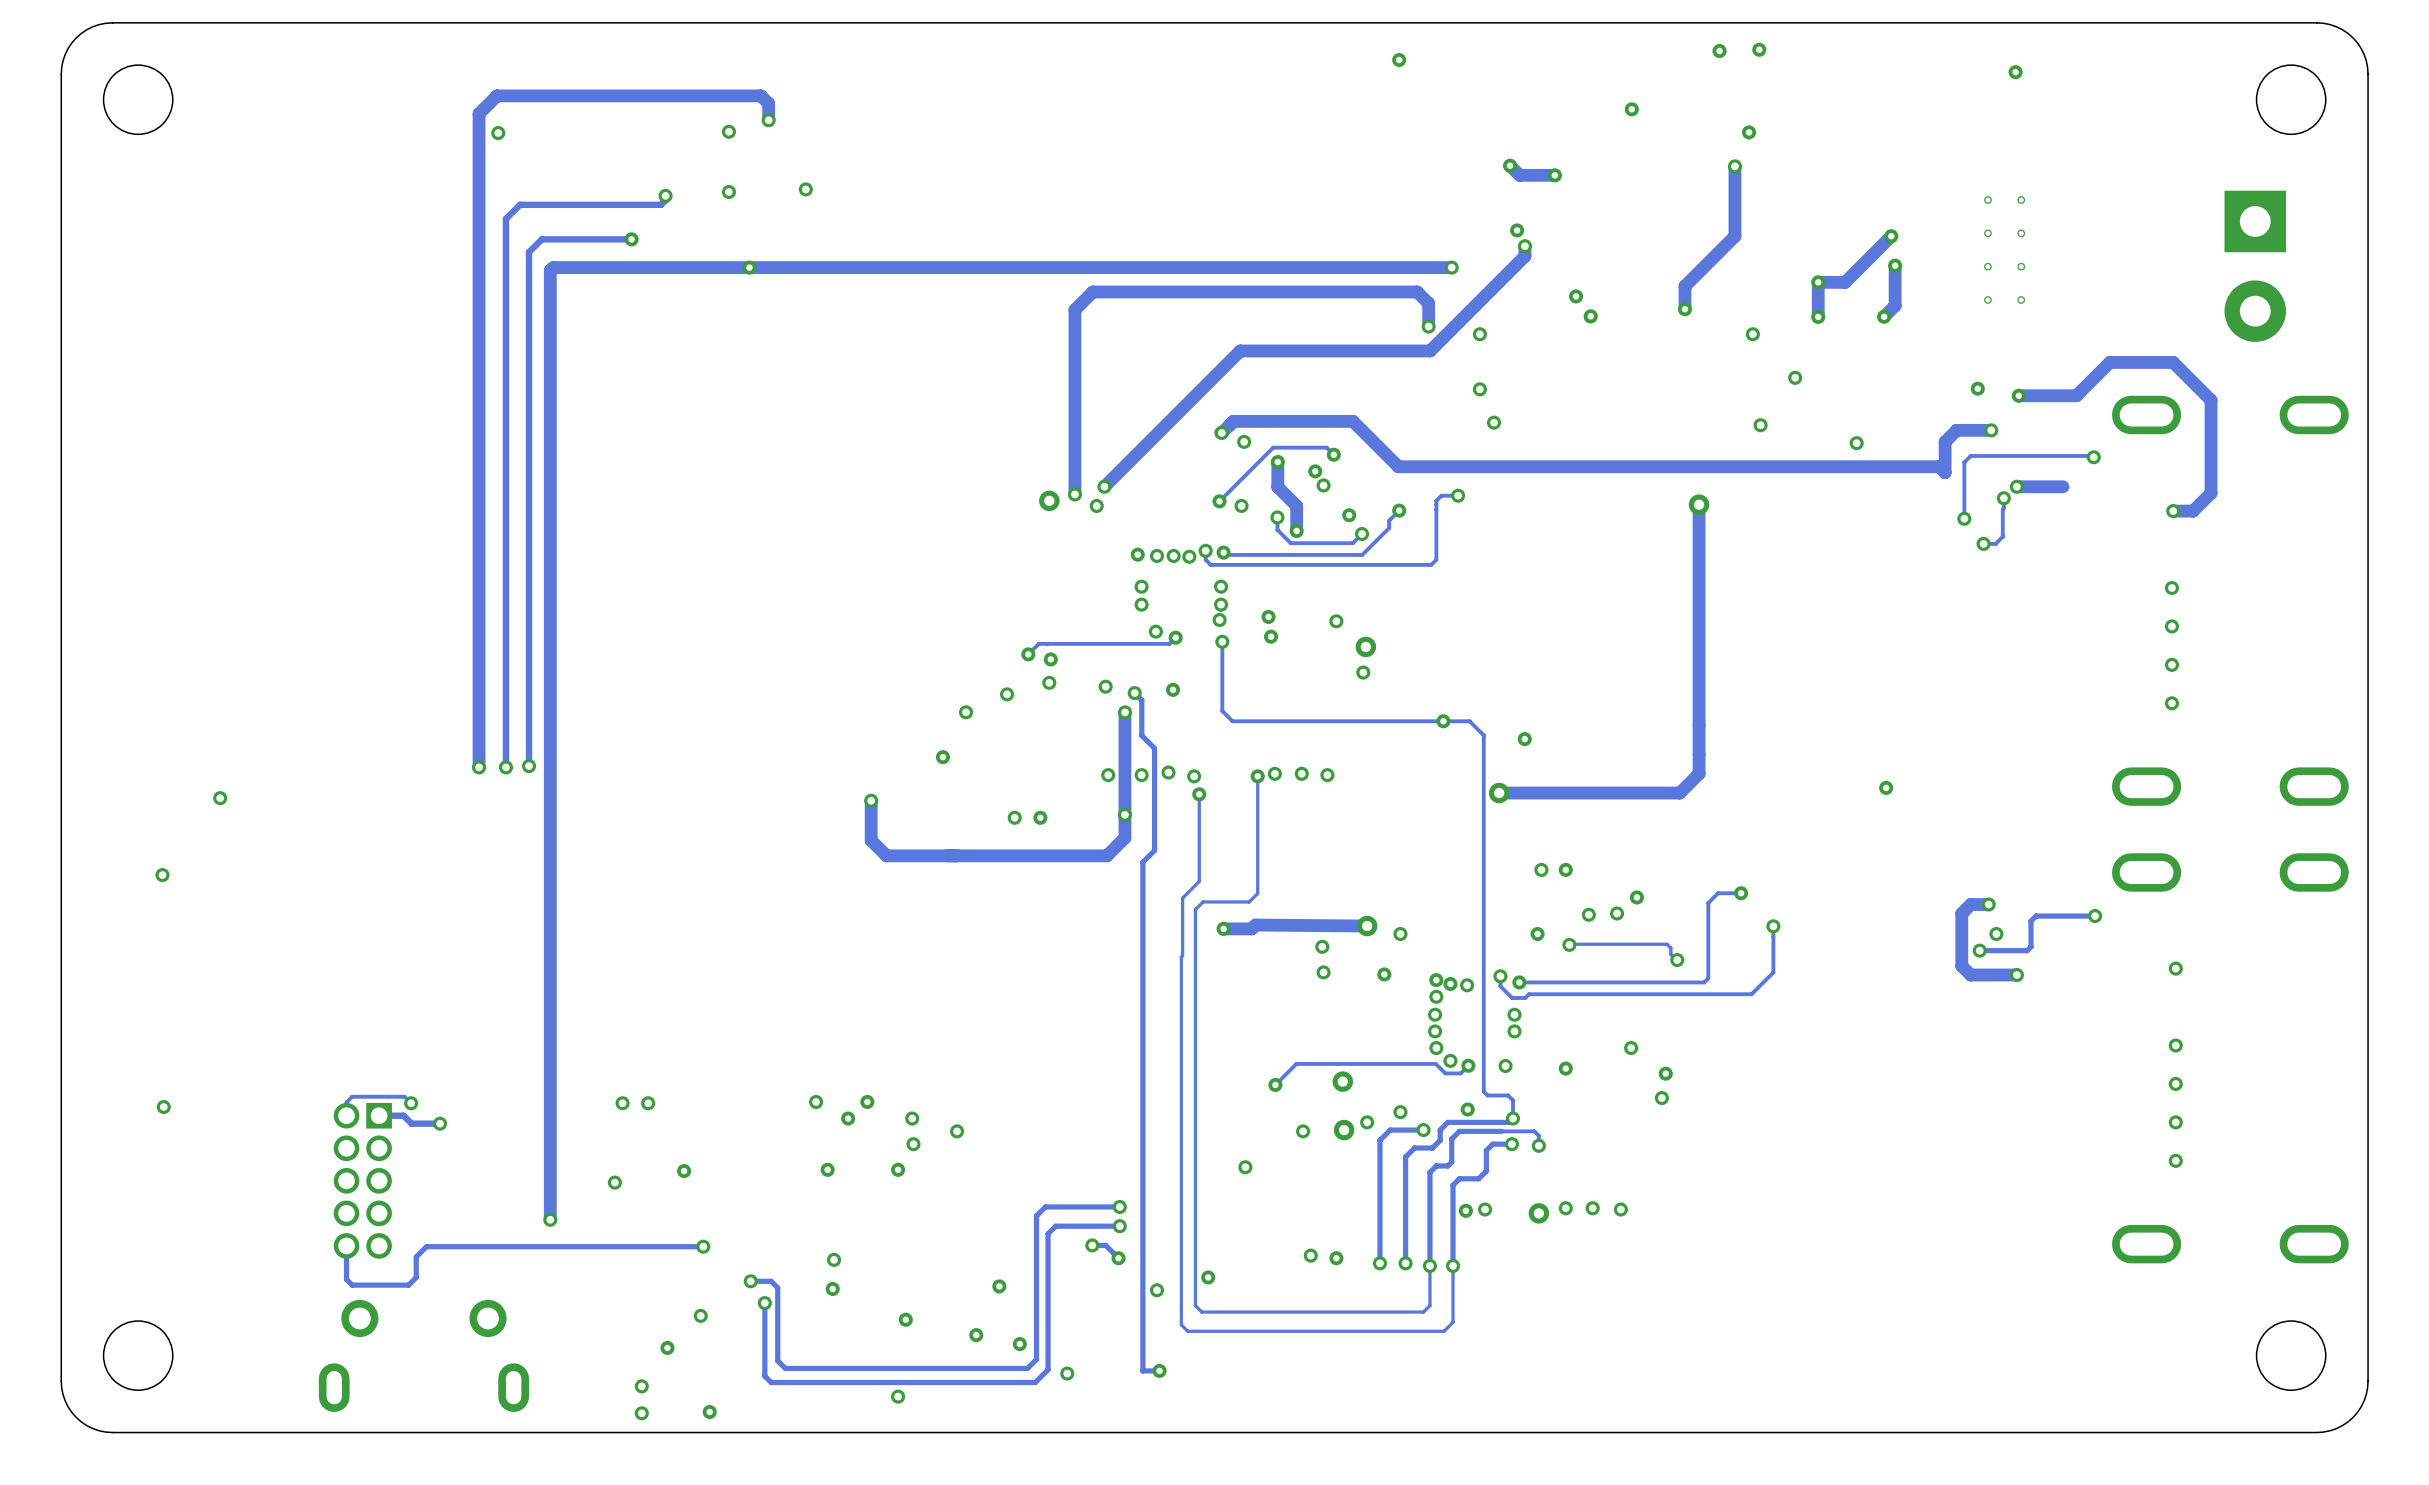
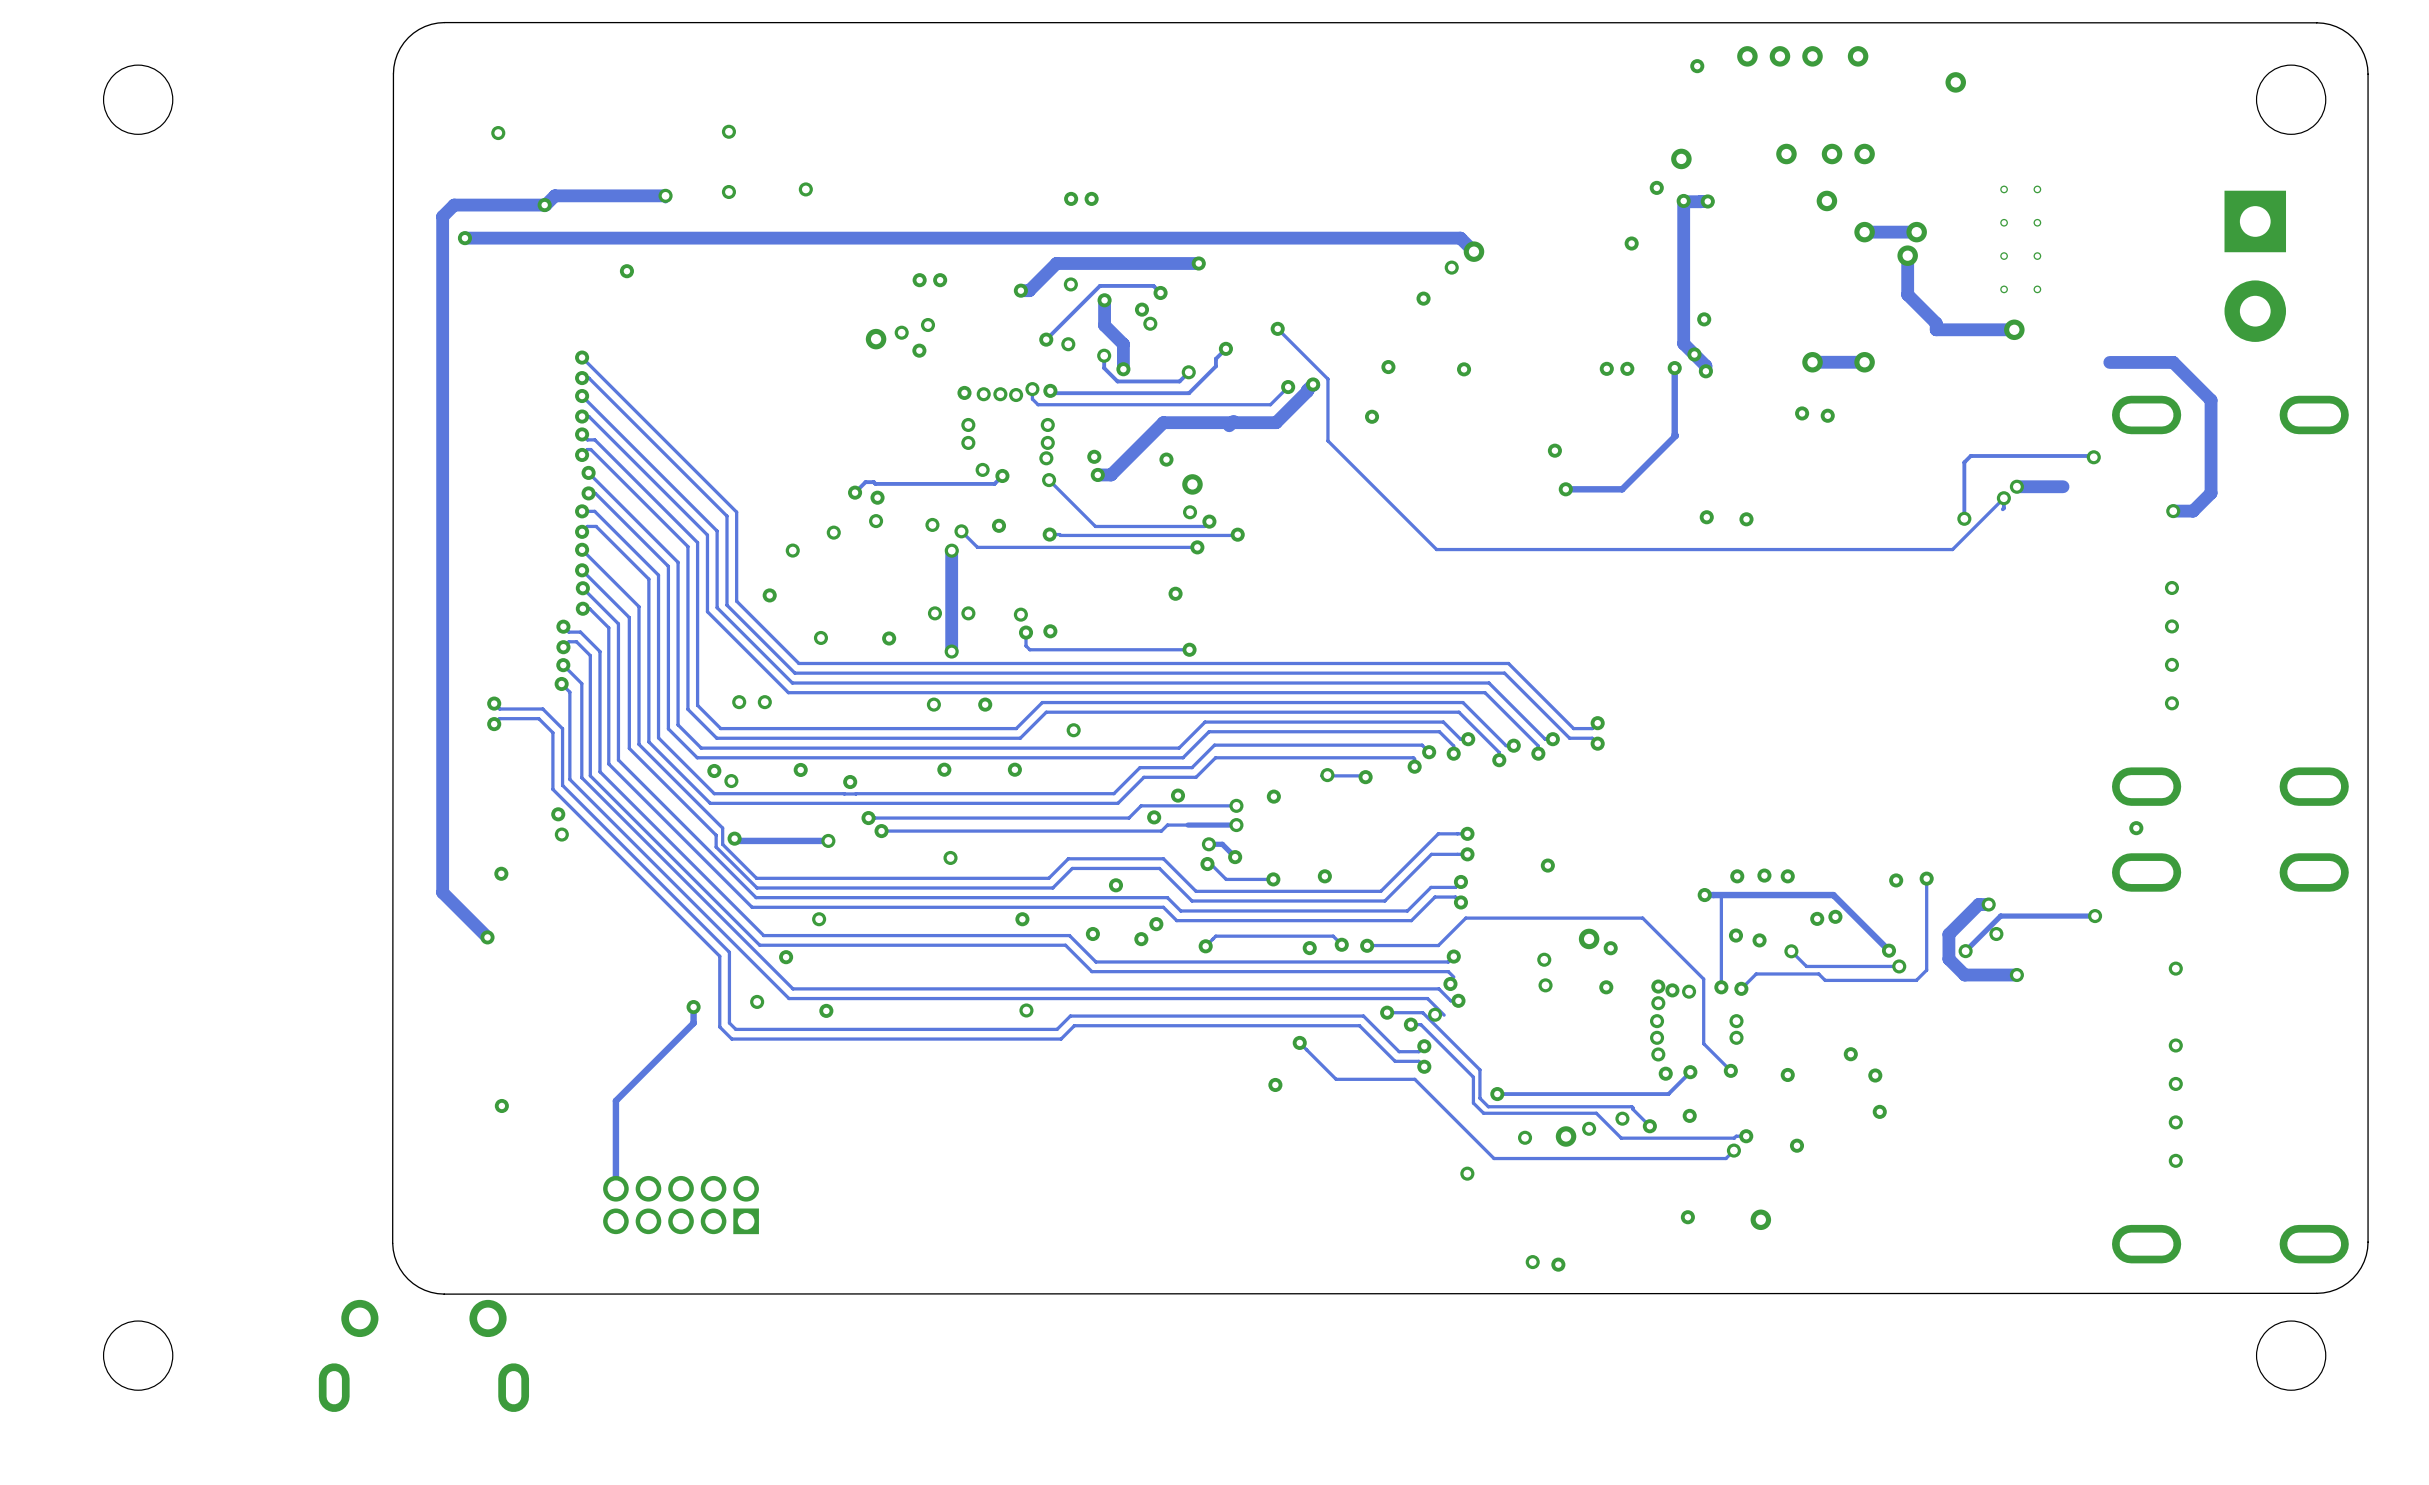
board edge: (2316, 22) (112, 22) (99, 24) (86, 29) (76, 37) (68, 48) (63, 60) (61, 74) (61, 1381) (65, 1400) (76, 1417) (92, 1428) (112, 1432) (2316, 1432) (2336, 1428) (2347, 1421) (2361, 1406) (2366, 1394) (2368, 1381) (2368, 1242) -> (2316, 22) (444, 22) (431, 24) (419, 29) (408, 37) (400, 48) (395, 60) (393, 73) (392, 1243) (396, 1262) (408, 1279) (424, 1290) (444, 1294) (2316, 1293) (2336, 1289) (2353, 1278) (2364, 1261) (2368, 1242)
via position: (1759, 49) -> (1747, 56)
via position: (1719, 51) -> (1697, 66)
via: none -> (1779, 56)
via: none -> (1812, 56)
via: none -> (1858, 56)
via: (1399, 60) -> none
via: (2015, 72) -> none
via: none -> (1955, 82)
via: (1631, 109) -> none
track: (768, 120) (768, 103) (760, 95) (496, 95) (479, 113) (479, 767) -> none
via: (768, 120) -> none
via: (1749, 132) -> none
via: none -> (1786, 154)
via: none -> (1832, 154)
via: none -> (1864, 154)
via: none -> (1681, 158)
track: (1510, 165) (1519, 175) (1554, 175) -> none
via: (1510, 165) -> none
track: (1734, 166) (1734, 236) (1684, 286) (1684, 309) -> none
via: (1734, 166) -> none
via: (1554, 175) -> none
via: none -> (1656, 187)
track: none -> (665, 195) (554, 195) (545, 205) (454, 205) (442, 216) (442, 892) (487, 937)
via: none -> (1071, 198)
via: none -> (1091, 198)
track: (665, 200) (661, 204) (520, 204) (505, 218) (505, 767) -> none
via: none -> (1683, 200)
via: none -> (1826, 200)
track: none -> (1700, 201) (1683, 200) (1683, 343) (1705, 365) (1705, 371)
via: none -> (1707, 201)
via: none -> (544, 205)
via: (1517, 230) -> none
via: none -> (1864, 232)
track: none -> (1916, 232) (1864, 232)
via: none -> (1916, 232)
track: (1891, 236) (1845, 282) (1818, 282) (1818, 316) -> none
via: (1891, 236) -> none
track: none -> (464, 238) (1460, 238) (1473, 251)
via: none -> (464, 238)
track: (631, 239) (541, 239) (529, 252) (529, 766) -> none
via position: (631, 239) -> (626, 271)
via: none -> (1631, 243)
track: (1524, 246) (1524, 256) (1430, 350) (1240, 350) (1104, 486) -> none
via: (1524, 246) -> none
part position: (2004, 250) -> (2020, 239)
via: none -> (1473, 251)
track: none -> (1907, 255) (1907, 294) (1936, 323) (1936, 329) (2014, 329)
track: none -> (1198, 263) (1056, 263) (1029, 290) (1020, 290)
via: none -> (1198, 263)
track: (1895, 265) (1895, 305) (1884, 316) -> none
via position: (1895, 265) -> (1907, 255)
via: (749, 267) -> none
track: (1451, 267) (553, 267) (550, 270) (550, 1219) -> none
via: none -> (919, 280)
via: none -> (940, 280)
via: (1818, 282) -> none
via: none -> (1070, 284)
via: none -> (1020, 290)
via: none -> (1160, 292)
via: (1576, 296) -> none
via: none -> (1423, 298)
via: none -> (1104, 300)
via: none -> (1141, 309)
via position: (1684, 309) -> (1704, 319)
via: (1590, 316) -> none
via: (1818, 316) -> none
via: (1884, 316) -> none
via: none -> (1150, 323)
via: none -> (928, 325)
track: (1428, 326) (1428, 303) (1417, 291) (1092, 291) (1074, 309) (1074, 494) -> none
via: (1428, 326) -> none
track: none -> (1277, 328) (1327, 379) (1327, 440) (1436, 549) (1952, 549) (2003, 498)
via: none -> (1277, 328)
via: none -> (2014, 329)
via: none -> (901, 332)
via: (1479, 334) -> none
via: (1752, 334) -> none
via: none -> (876, 339)
via: none -> (1046, 339)
via: none -> (1068, 344)
via: none -> (1225, 348)
via: none -> (919, 350)
via: none -> (1694, 354)
via: none -> (1104, 355)
track: none -> (582, 357) (736, 512) (736, 601) (798, 663) (1508, 663) (1573, 728) (1592, 728) (1597, 723)
via: none -> (582, 357)
via: none -> (1812, 362)
track: none -> (1864, 362) (1812, 362)
via: none -> (1864, 362)
track: (2109, 362) (2076, 395) (2018, 395) -> none
via: none -> (1388, 367)
via: none -> (1606, 368)
via: none -> (1627, 368)
track: none -> (1674, 368) (1675, 435) (1622, 489) (1565, 489)
via: none -> (1674, 368)
via: none -> (1123, 369)
via: none -> (1464, 369)
via: none -> (1705, 371)
via: none -> (1188, 372)
via: (1795, 377) -> none
track: none -> (582, 378) (588, 378) (726, 516) (726, 605) (794, 673) (1504, 673) (1569, 738) (1592, 738) (1597, 743)
via: none -> (582, 378)
track: none -> (1313, 384) (1276, 422) (1163, 422) (1111, 474) (1097, 474)
via: none -> (1313, 384)
track: none -> (1288, 387) (1270, 404) (1038, 404) (1032, 399) (1032, 389)
via: none -> (1288, 387)
via: (1977, 388) -> none
via: none -> (1032, 389)
via: (1479, 389) -> none
via: none -> (1050, 390)
via: none -> (964, 392)
via: none -> (983, 394)
via: none -> (1000, 394)
via: none -> (1016, 395)
via: (2018, 395) -> none
track: none -> (582, 396) (717, 531) (717, 607) (792, 683) (1489, 683) (1545, 739) (1552, 739)
via: none -> (582, 396)
via: none -> (1802, 413)
via: none -> (1827, 415)
track: none -> (582, 416) (588, 416) (707, 535) (707, 611) (788, 692) (1485, 692) (1538, 746) (1538, 753)
via: none -> (582, 416)
via: none -> (1372, 416)
via: (1494, 422) -> none
via: none -> (968, 424)
via: none -> (1047, 424)
via: (1760, 425) -> none
track: (1991, 430) (1956, 430) (1945, 441) (1945, 472) (1939, 466) (1398, 466) (1353, 421) (1233, 421) (1220, 432) -> none
via: (1991, 430) -> none
via: (1221, 432) -> none
track: none -> (582, 434) (587, 439) (594, 439) (697, 542) (697, 705) (720, 728) (1016, 728) (1042, 702) (1462, 702) (1506, 745) (1513, 745)
via: none -> (582, 434)
via: (1244, 441) -> none
via: none -> (968, 442)
via: none -> (1047, 442)
via: (1856, 443) -> none
via: none -> (1554, 450)
track: none -> (582, 454) (587, 449) (590, 449) (687, 546) (687, 709) (716, 738) (1020, 738) (1046, 712) (1458, 712) (1499, 752) (1499, 760)
via: none -> (582, 454)
track: (1333, 454) (1326, 447) (1273, 447) (1219, 501) -> (1160, 292) (1153, 285) (1099, 285) (1046, 339)
via: (1333, 454) -> none
via: none -> (1094, 456)
via: none -> (1046, 458)
via: none -> (1166, 459)
track: (1277, 462) (1277, 487) (1296, 505) (1296, 530) -> (1104, 300) (1104, 325) (1123, 344) (1123, 369)
via: (1277, 462) -> none
via: none -> (982, 469)
via: (1315, 471) -> none
track: none -> (588, 472) (678, 562) (678, 724) (701, 748) (1179, 748) (1205, 722) (1443, 722) (1460, 739) (1468, 739)
via: none -> (588, 472)
track: none -> (1002, 475) (994, 483) (875, 483) (865, 482) (855, 492)
via: none -> (1002, 475)
track: none -> (1049, 480) (1095, 526) (1204, 526) (1209, 521)
via: none -> (1049, 480)
via: none -> (1192, 484)
via: (1323, 485) -> none
via position: (1104, 486) -> (1097, 474)
via: none -> (1565, 489)
via: none -> (855, 492)
track: none -> (588, 493) (595, 493) (668, 566) (668, 728) (697, 757) (1183, 757) (1209, 731) (1439, 731) (1453, 746) (1453, 753)
via: none -> (588, 493)
via: (1074, 494) -> none
track: (1458, 495) (1441, 495) (1436, 500) (1436, 559) (1431, 564) (1210, 564) (1205, 559) (1205, 550) -> none
via: (1458, 495) -> none
via: none -> (877, 497)
via: (1049, 500) -> none
via: (1219, 501) -> none
track: (1699, 504) (1699, 773) (1679, 793) (1499, 793) -> none
via position: (1699, 504) -> (1706, 517)
via: (1096, 505) -> none
via: (1241, 505) -> none
track: (2002, 509) (2002, 536) (1995, 543) (1983, 543) -> none
track: (1399, 510) (1389, 520) (1389, 528) (1362, 554) (1225, 554) (1223, 552) -> (1225, 348) (1215, 358) (1215, 366) (1189, 393) (1052, 393) (1050, 390)
via: (1399, 510) -> none
track: none -> (582, 511) (594, 511) (658, 575) (658, 737) (714, 793) (844, 793)
via: none -> (582, 511)
via: none -> (1190, 512)
via: (1349, 515) -> none
track: (1277, 517) (1277, 529) (1290, 543) (1352, 543) (1362, 534) -> (1104, 355) (1104, 368) (1117, 381) (1179, 381) (1188, 372)
via: (1277, 517) -> none
via: none -> (1746, 519)
via: none -> (876, 521)
via: none -> (1209, 521)
via: none -> (932, 524)
via: none -> (998, 525)
via: (1296, 530) -> none
track: none -> (582, 531) (587, 526) (596, 526) (648, 579) (648, 741) (710, 803) (1117, 803) (1143, 777) (1196, 777) (1215, 757) (1413, 757) (1414, 766)
via: none -> (582, 531)
track: none -> (961, 531) (977, 547) (1197, 547)
via: none -> (961, 531)
via: none -> (833, 532)
via: none -> (1049, 534)
track: none -> (1237, 534) (1049, 534)
via: none -> (1237, 534)
via: (1362, 534) -> none
via: (1983, 543) -> none
via: none -> (1197, 547)
track: none -> (582, 549) (639, 606) (639, 744) (722, 828) (722, 844) (756, 878) (1048, 878) (1068, 858) (1163, 858) (1196, 891) (1380, 891) (1438, 833) (1467, 833)
via: none -> (582, 549)
via: none -> (792, 550)
track: none -> (951, 550) (951, 651)
via: none -> (951, 550)
via: (1205, 550) -> none
via: (1223, 552) -> none
via: (1137, 554) -> none
via: (1156, 555) -> none
via: (1173, 555) -> none
via: (1189, 556) -> none
track: none -> (582, 570) (629, 617) (629, 748) (716, 835) (716, 847) (757, 887) (1052, 887) (1072, 868) (1159, 868) (1192, 901) (1384, 901) (1431, 854) (1467, 854)
via: none -> (582, 570)
via: (1141, 586) -> none
via: (1221, 586) -> none
track: none -> (582, 588) (618, 623) (618, 760) (756, 897) (1167, 897) (1180, 910) (1407, 910) (1431, 887) (1455, 887) (1460, 881)
via: none -> (582, 588)
via: none -> (1175, 593)
via: none -> (769, 595)
via: (1141, 604) -> none
via: (1221, 604) -> none
track: none -> (582, 608) (589, 608) (608, 627) (608, 764) (752, 907) (1163, 907) (1176, 920) (1411, 920) (1435, 897) (1455, 897) (1460, 902)
via: none -> (582, 608)
via: none -> (934, 613)
via: none -> (968, 613)
via: none -> (1020, 614)
via: (1268, 616) -> none
via: (1219, 620) -> none
via: (1336, 621) -> none
track: none -> (563, 626) (568, 632) (580, 632) (599, 651) (599, 771) (763, 935) (1069, 935) (1095, 961) (1448, 961) (1453, 956)
via: none -> (563, 626)
via: none -> (1050, 631)
via: (1155, 631) -> none
track: none -> (1026, 632) (1026, 645) (1029, 649) (1189, 649)
via: none -> (1026, 632)
via: (1271, 636) -> none
via: none -> (820, 637)
track: (1175, 637) (1169, 643) (1038, 643) (1028, 654) -> none
via position: (1175, 637) -> (1189, 649)
via: none -> (889, 638)
track: (1222, 641) (1222, 711) (1232, 721) (1469, 721) (1483, 735) (1483, 1091) (1487, 1095) (1508, 1095) (1513, 1100) (1513, 1118) (1509, 1122) (1447, 1122) (1440, 1130) (1440, 1140) (1432, 1148) (1414, 1148) (1405, 1156) (1405, 1263) -> none
via: (1222, 641) -> none
via: (1365, 646) -> none
track: none -> (563, 647) (568, 641) (576, 641) (590, 655) (590, 775) (759, 945) (1065, 945) (1091, 971) (1448, 971) (1453, 977)
via: none -> (563, 647)
via: none -> (951, 651)
via: (1028, 654) -> none
via: (1050, 659) -> none
track: none -> (563, 665) (581, 683) (581, 777) (792, 988) (1438, 988) (1450, 1000) (1458, 1000)
via: none -> (563, 665)
via: (1363, 672) -> none
via: (1049, 682) -> none
track: none -> (561, 683) (569, 692) (569, 779) (788, 998) (1427, 998) (1444, 1015)
via: none -> (561, 683)
via: (1105, 686) -> none
via: (1173, 689) -> none
track: (1134, 693) (1141, 700) (1141, 735) (1154, 748) (1154, 850) (1142, 862) (1142, 1370) -> none
via: (1134, 693) -> none
via: (1007, 694) -> none
via: none -> (739, 702)
via: none -> (764, 702)
track: none -> (494, 703) (499, 709) (542, 709) (562, 728) (562, 785) (729, 952) (729, 1022) (735, 1029) (1057, 1029) (1070, 1016) (1363, 1016) (1399, 1051) (1418, 1051) (1424, 1046)
via: none -> (494, 703)
via: none -> (933, 704)
via: none -> (985, 704)
via: (966, 712) -> none
track: (1124, 712) (1124, 837) (1107, 855) (886, 855) (871, 840) (871, 800) -> none
via: (1125, 712) -> none
via: (1443, 721) -> none
via: none -> (1597, 723)
track: none -> (494, 724) (499, 718) (538, 718) (552, 732) (552, 789) (719, 956) (719, 1026) (731, 1039) (1061, 1039) (1074, 1025) (1359, 1025) (1395, 1061) (1418, 1061) (1424, 1066)
via: none -> (494, 724)
via: none -> (1073, 730)
via: none -> (1468, 739)
via position: (1524, 739) -> (1513, 745)
via: none -> (1552, 739)
via: none -> (1597, 743)
track: none -> (1429, 752) (1422, 745) (1214, 745) (1192, 767) (1139, 767) (1113, 793) (856, 793)
via: none -> (1429, 752)
via: none -> (1453, 753)
via: none -> (1538, 753)
via position: (942, 757) -> (944, 769)
via: none -> (1499, 760)
via: (529, 766) -> none
via: none -> (1414, 766)
via: (479, 767) -> none
via: (505, 767) -> none
via: none -> (800, 769)
via: none -> (1014, 769)
via: none -> (714, 770)
via: (1168, 772) -> none
via: (1274, 773) -> none
via: (1301, 773) -> none
via: (1108, 775) -> none
via: (1141, 775) -> none
track: none -> (1321, 775) (1365, 777)
via: (1194, 776) -> none
track: (1257, 776) (1257, 893) (1249, 901) (1203, 901) (1195, 909) (1195, 1305) (1201, 1312) (1423, 1312) (1429, 1305) (1429, 1172) (1436, 1165) (1447, 1165) (1451, 1162) (1451, 1139) (1459, 1131) (1534, 1131) (1538, 1135) (1538, 1145) -> none
via position: (1257, 776) -> (1273, 796)
via: none -> (1365, 777)
via: none -> (731, 781)
via: none -> (850, 782)
via: (1886, 787) -> none
track: none -> (855, 793) (844, 793)
via: (1499, 793) -> none
track: (1199, 794) (1199, 881) (1182, 898) (1181, 1324) (1187, 1331) (1444, 1331) (1453, 1322) (1453, 1185) (1459, 1178) (1478, 1178) (1486, 1171) (1486, 1150) (1492, 1144) (1511, 1144) -> none
via position: (1199, 794) -> (1178, 795)
via: (220, 798) -> none
via: (871, 800) -> none
track: none -> (1236, 805) (1141, 805) (1128, 818) (868, 818)
via: none -> (1236, 805)
via: none -> (558, 814)
via: (1124, 814) -> none
via: (1014, 817) -> none
via: (1040, 817) -> none
via: none -> (1154, 817)
via: none -> (868, 818)
track: none -> (1236, 825) (1167, 825) (1161, 831) (881, 831)
via: none -> (1236, 825)
via: none -> (2136, 828)
via: none -> (881, 831)
via: none -> (1467, 833)
via: none -> (561, 834)
track: none -> (734, 838) (736, 840) (828, 840)
via: none -> (734, 838)
via: none -> (828, 840)
via: none -> (1208, 844)
via: none -> (1467, 854)
via: none -> (950, 857)
via: none -> (1235, 857)
track: none -> (1207, 864) (1210, 864) (1226, 879) (1273, 879)
via: none -> (1207, 864)
via: (1541, 869) -> none
via position: (1565, 869) -> (1547, 865)
via: none -> (501, 873)
via: (162, 875) -> none
via: none -> (1764, 875)
via: none -> (1324, 876)
via: none -> (1737, 876)
via: none -> (1787, 876)
track: none -> (1926, 878) (1926, 970) (1916, 980) (1825, 980) (1818, 973) (1756, 973) (1741, 988)
via: none -> (1926, 878)
via: none -> (1273, 879)
via: none -> (1896, 880)
via: none -> (1460, 881)
via: none -> (1115, 885)
track: (1741, 893) (1718, 893) (1708, 902) (1708, 978) (1704, 982) (1519, 982) -> none
via: (1741, 893) -> none
track: none -> (1704, 895) (1833, 895) (1888, 950)
via: none -> (1704, 895)
track: none -> (1713, 895) (1721, 896) (1721, 987)
via: (1636, 897) -> none
via: none -> (1460, 902)
track: (1978, 904) (1970, 904) (1961, 913) (1961, 966) (1970, 975) -> (1978, 904) (1948, 934) (1948, 959) (1964, 975) (1970, 975)
via: (1617, 913) -> none
via: (1588, 914) -> none
via: none -> (1835, 916)
track: (2036, 916) (2030, 921) (2030, 946) (2027, 950) (1979, 950) -> (2036, 916) (2000, 916) (1965, 951)
via: none -> (1817, 918)
via: none -> (819, 919)
via: none -> (1022, 919)
via: none -> (1156, 924)
track: (1367, 926) (1255, 925) (1251, 928) (1223, 928) -> none
via: (1367, 926) -> none
track: (1773, 926) (1773, 972) (1751, 994) (1529, 994) (1525, 998) (1512, 998) (1500, 986) (1500, 976) -> none
via position: (1773, 926) -> (1791, 951)
via position: (1223, 928) -> (1205, 946)
via: none -> (1092, 934)
via: (1400, 934) -> none
via: (1537, 934) -> none
via: none -> (1735, 935)
via: none -> (487, 937)
via: none -> (1589, 938)
via: none -> (1141, 939)
via: none -> (1759, 940)
track: none -> (1341, 944) (1333, 936) (1215, 936) (1205, 946)
via: none -> (1341, 944)
track: (1569, 944) (1667, 944) (1670, 948) (1670, 954) (1677, 960) -> none
via: (1569, 944) -> none
track: none -> (1367, 945) (1438, 945) (1465, 918) (1642, 918) (1703, 979) (1703, 1043) (1730, 1070)
via: none -> (1367, 945)
via position: (1322, 946) -> (1309, 948)
via: none -> (1610, 948)
via: none -> (1888, 950)
via position: (1979, 950) -> (1965, 951)
track: none -> (1791, 951) (1806, 966) (1899, 966)
via: none -> (1453, 956)
via: none -> (786, 957)
via: none -> (1544, 959)
via: (1677, 960) -> none
via: none -> (1899, 966)
via: (1323, 972) -> none
via: (1384, 974) -> none
via: (1500, 976) -> none
via: (1436, 980) -> none
via: (1519, 982) -> none
via: (1467, 985) -> none
via: none -> (1545, 985)
via: none -> (1658, 986)
via: none -> (1606, 987)
via: none -> (1721, 987)
via: none -> (1741, 988)
via: none -> (1672, 990)
via: none -> (1689, 991)
via: (1436, 996) -> none
via: none -> (1458, 1000)
via: none -> (757, 1001)
via: none -> (1658, 1003)
track: none -> (693, 1007) (693, 1023) (615, 1100) (615, 1188)
via: none -> (693, 1007)
via: none -> (826, 1010)
via: none -> (1026, 1010)
track: none -> (1387, 1012) (1422, 1012) (1479, 1069) (1479, 1098) (1488, 1106) (1631, 1106) (1649, 1126)
via: none -> (1387, 1012)
via: (1514, 1014) -> none
via: none -> (1657, 1021)
via: none -> (1736, 1021)
track: none -> (1410, 1024) (1420, 1024) (1473, 1077) (1473, 1103) (1483, 1113) (1596, 1113) (1621, 1138) (1734, 1138) (1736, 1136) (1746, 1136)
via: none -> (1410, 1024)
via: (1435, 1031) -> none
via: (1514, 1031) -> none
via: none -> (1657, 1037)
via: none -> (1736, 1037)
track: none -> (1299, 1042) (1336, 1079) (1414, 1079) (1494, 1158) (1725, 1158) (1733, 1150)
via: none -> (1299, 1042)
via position: (1436, 1048) -> (1424, 1046)
via: (1631, 1048) -> none
via: none -> (1658, 1054)
via: none -> (1850, 1054)
via: (1450, 1060) -> none
track: (1468, 1065) (1460, 1073) (1445, 1073) (1435, 1063) (1296, 1063) (1275, 1084) -> none
via: (1468, 1065) -> none
via: none -> (1424, 1066)
via: (1505, 1066) -> none
via: (1565, 1068) -> none
via: none -> (1730, 1070)
track: none -> (1690, 1072) (1668, 1094) (1497, 1094)
via: none -> (1690, 1072)
via: none -> (1787, 1074)
via: none -> (1875, 1075)
via: (1342, 1081) -> none
via: none -> (1497, 1094)
via: (1661, 1098) -> none
via: (816, 1101) -> none
via: (867, 1101) -> none
track: (411, 1103) (404, 1096) (352, 1096) (346, 1102) (346, 1115) -> none
via: (411, 1103) -> none
via: (622, 1103) -> none
via: (648, 1103) -> none
via: none -> (501, 1105)
via: (163, 1107) -> none
via: (1467, 1109) -> none
via: none -> (1879, 1111)
via: (1400, 1112) -> none
track: (379, 1115) (403, 1115) (411, 1123) (440, 1123) -> none
via: none -> (1689, 1115)
via: (848, 1118) -> none
via: (912, 1118) -> none
via: (1513, 1118) -> none
via: none -> (1622, 1118)
via: (1367, 1122) -> none
via: (440, 1123) -> none
via: none -> (1649, 1126)
via: none -> (1589, 1128)
via: (1344, 1130) -> none
track: (1423, 1130) (1390, 1130) (1379, 1140) (1379, 1263) -> none
via: (1423, 1130) -> none
via: (957, 1131) -> none
via: (1303, 1131) -> none
via: none -> (1746, 1136)
via: none -> (1525, 1137)
via: (913, 1144) -> none
via: (1511, 1144) -> none
via: (1538, 1145) -> none
via: none -> (1796, 1145)
via: none -> (1733, 1150)
via: (1245, 1167) -> none
via: (827, 1169) -> none
via: (898, 1169) -> none
via: (684, 1171) -> none
via: none -> (1467, 1173)
part rotation: 0° (362, 1180) -> 90° clockwise (681, 1205)
part position: (362, 1180) -> (681, 1205)
via: (614, 1182) -> none
track: (1119, 1206) (1045, 1206) (1036, 1215) (1036, 1359) (1027, 1368) (785, 1368) (777, 1360) (777, 1287) (771, 1281) (750, 1281) -> none
via: (1119, 1206) -> none
via: (1565, 1208) -> none
via: (1592, 1208) -> none
via: (1485, 1209) -> none
via: (1620, 1209) -> none
via: (1465, 1210) -> none
via position: (1538, 1213) -> (1566, 1136)
via: none -> (1687, 1217)
via: (550, 1219) -> none
via: none -> (1760, 1219)
track: (1119, 1226) (1055, 1226) (1048, 1233) (1048, 1369) (1035, 1382) (771, 1382) (764, 1376) (764, 1303) -> none
via: (1119, 1226) -> none
track: (346, 1245) (346, 1279) (352, 1285) (408, 1285) (416, 1277) (416, 1256) (426, 1246) (703, 1246) -> none
track: (1092, 1245) (1105, 1245) (1118, 1258) -> (1208, 844) (1222, 844) (1235, 857)
via: (1092, 1245) -> none
via: (703, 1246) -> none
via: (1310, 1255) -> none
via: (1118, 1258) -> none
via: (1336, 1258) -> none
via: (834, 1259) -> none
via: none -> (1532, 1262)
via: (1379, 1263) -> none
via: (1405, 1263) -> none
via: none -> (1558, 1264)
via: (1429, 1265) -> none
via: (1453, 1265) -> none
via: (1208, 1277) -> none
via: (750, 1281) -> none
via: (999, 1286) -> none
via: (832, 1288) -> none
via: (1156, 1290) -> none
via: (764, 1303) -> none
via: (700, 1315) -> none
via: (905, 1319) -> none
via: (976, 1335) -> none
via: (1019, 1344) -> none
via: (667, 1347) -> none
track: (1159, 1370) (1142, 1370) -> none
via: (1159, 1370) -> none
via: (1067, 1373) -> none
via: (641, 1386) -> none
via: (898, 1396) -> none
via: (709, 1412) -> none
via: (641, 1413) -> none

